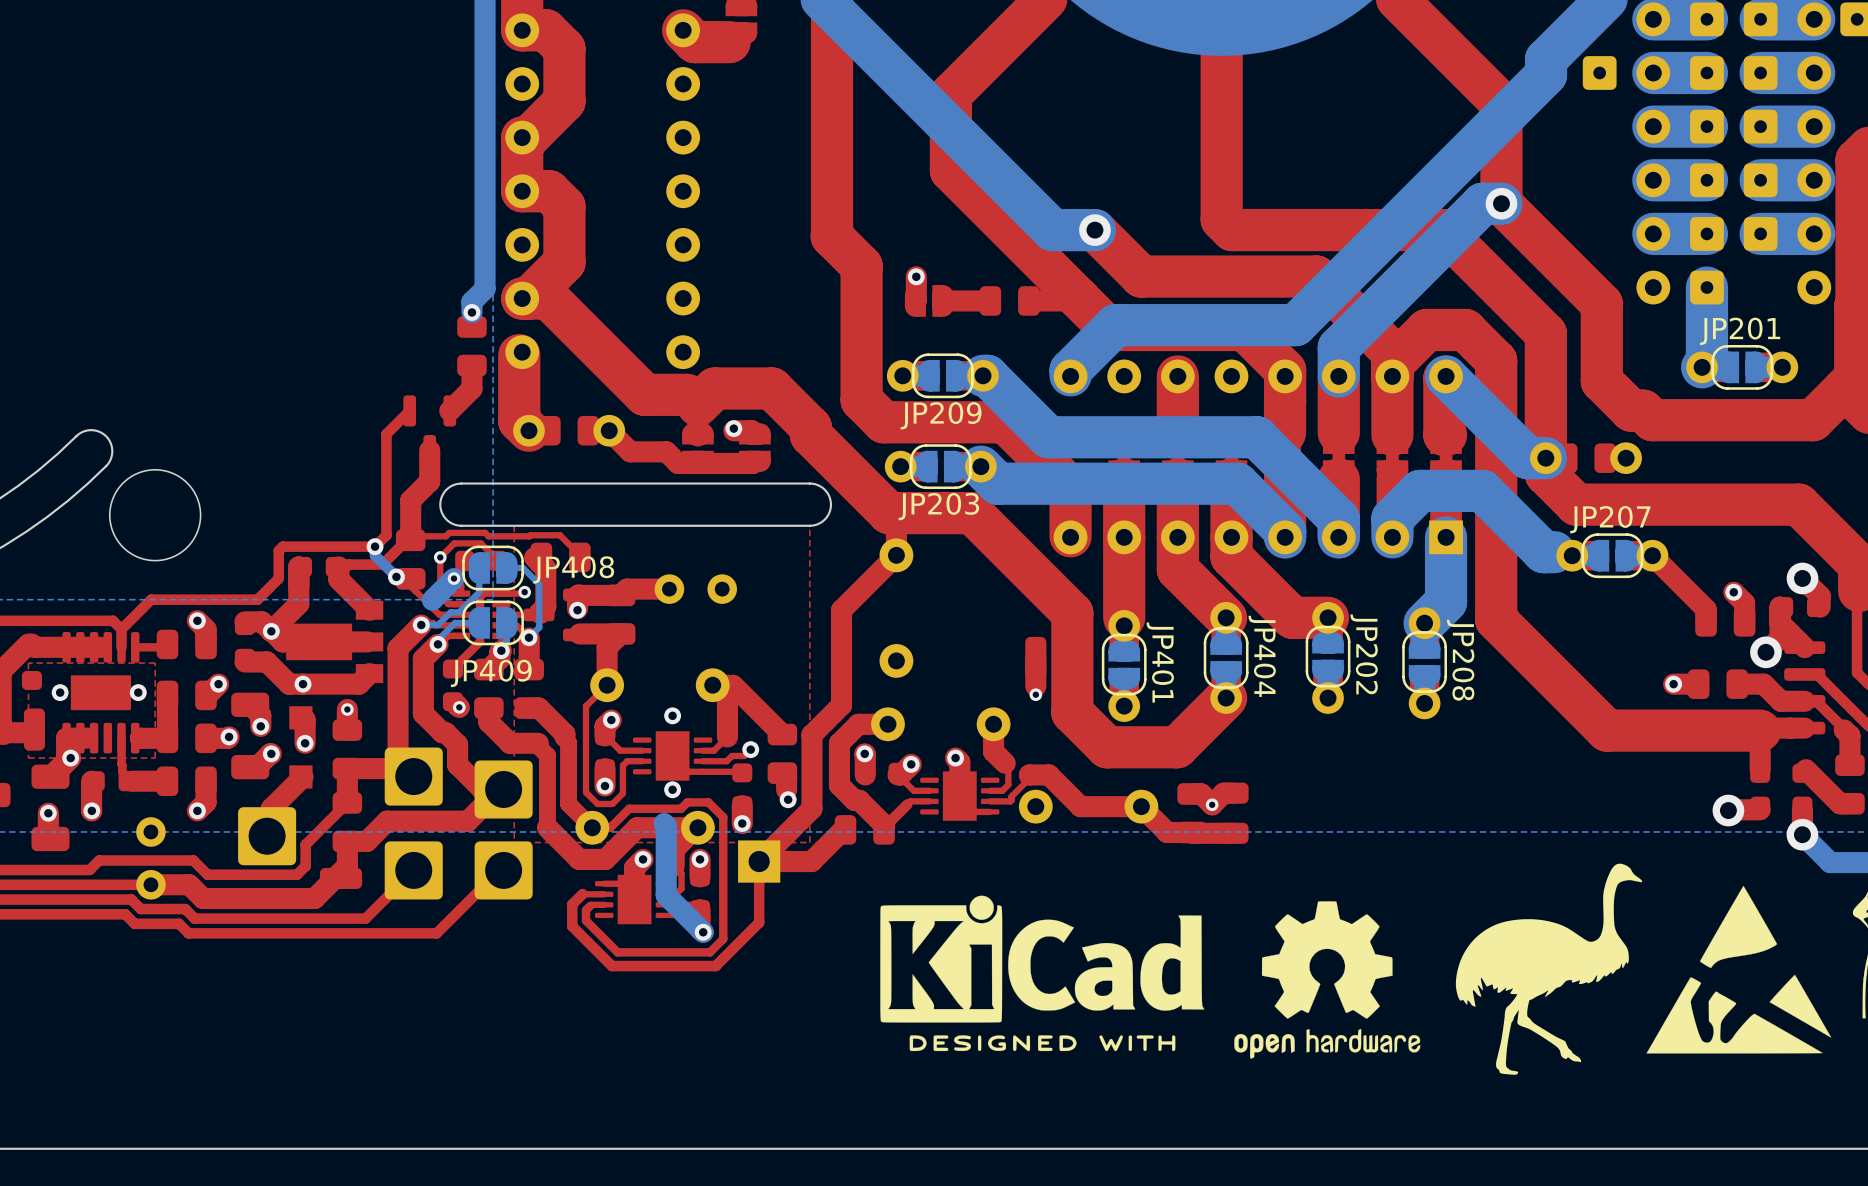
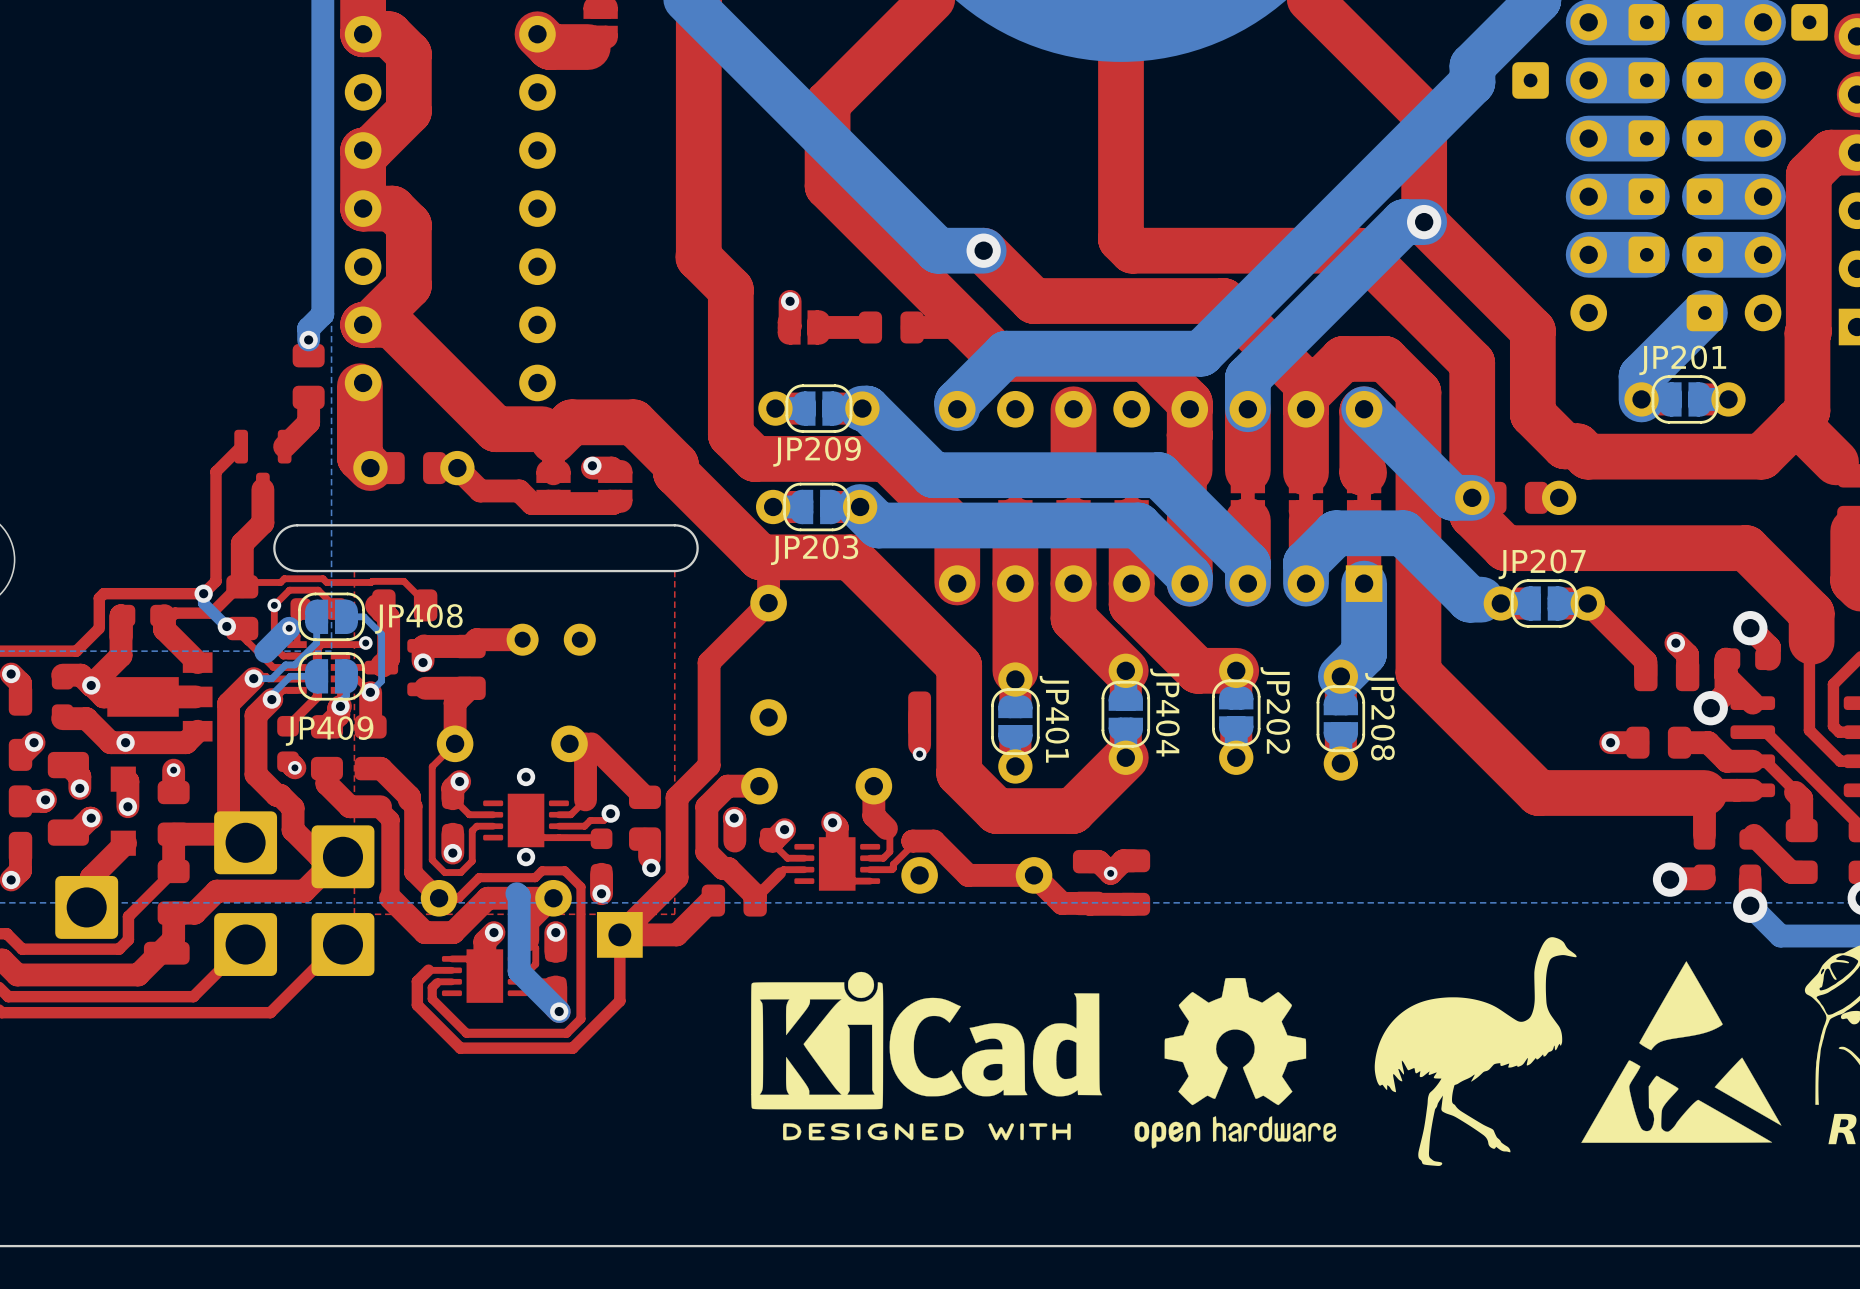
bottom track: (1706, 287) (1706, 362) (1702, 367) -> (1704, 312) (1641, 376) (1641, 399)
part position: (1706, 287) -> (1704, 312)

